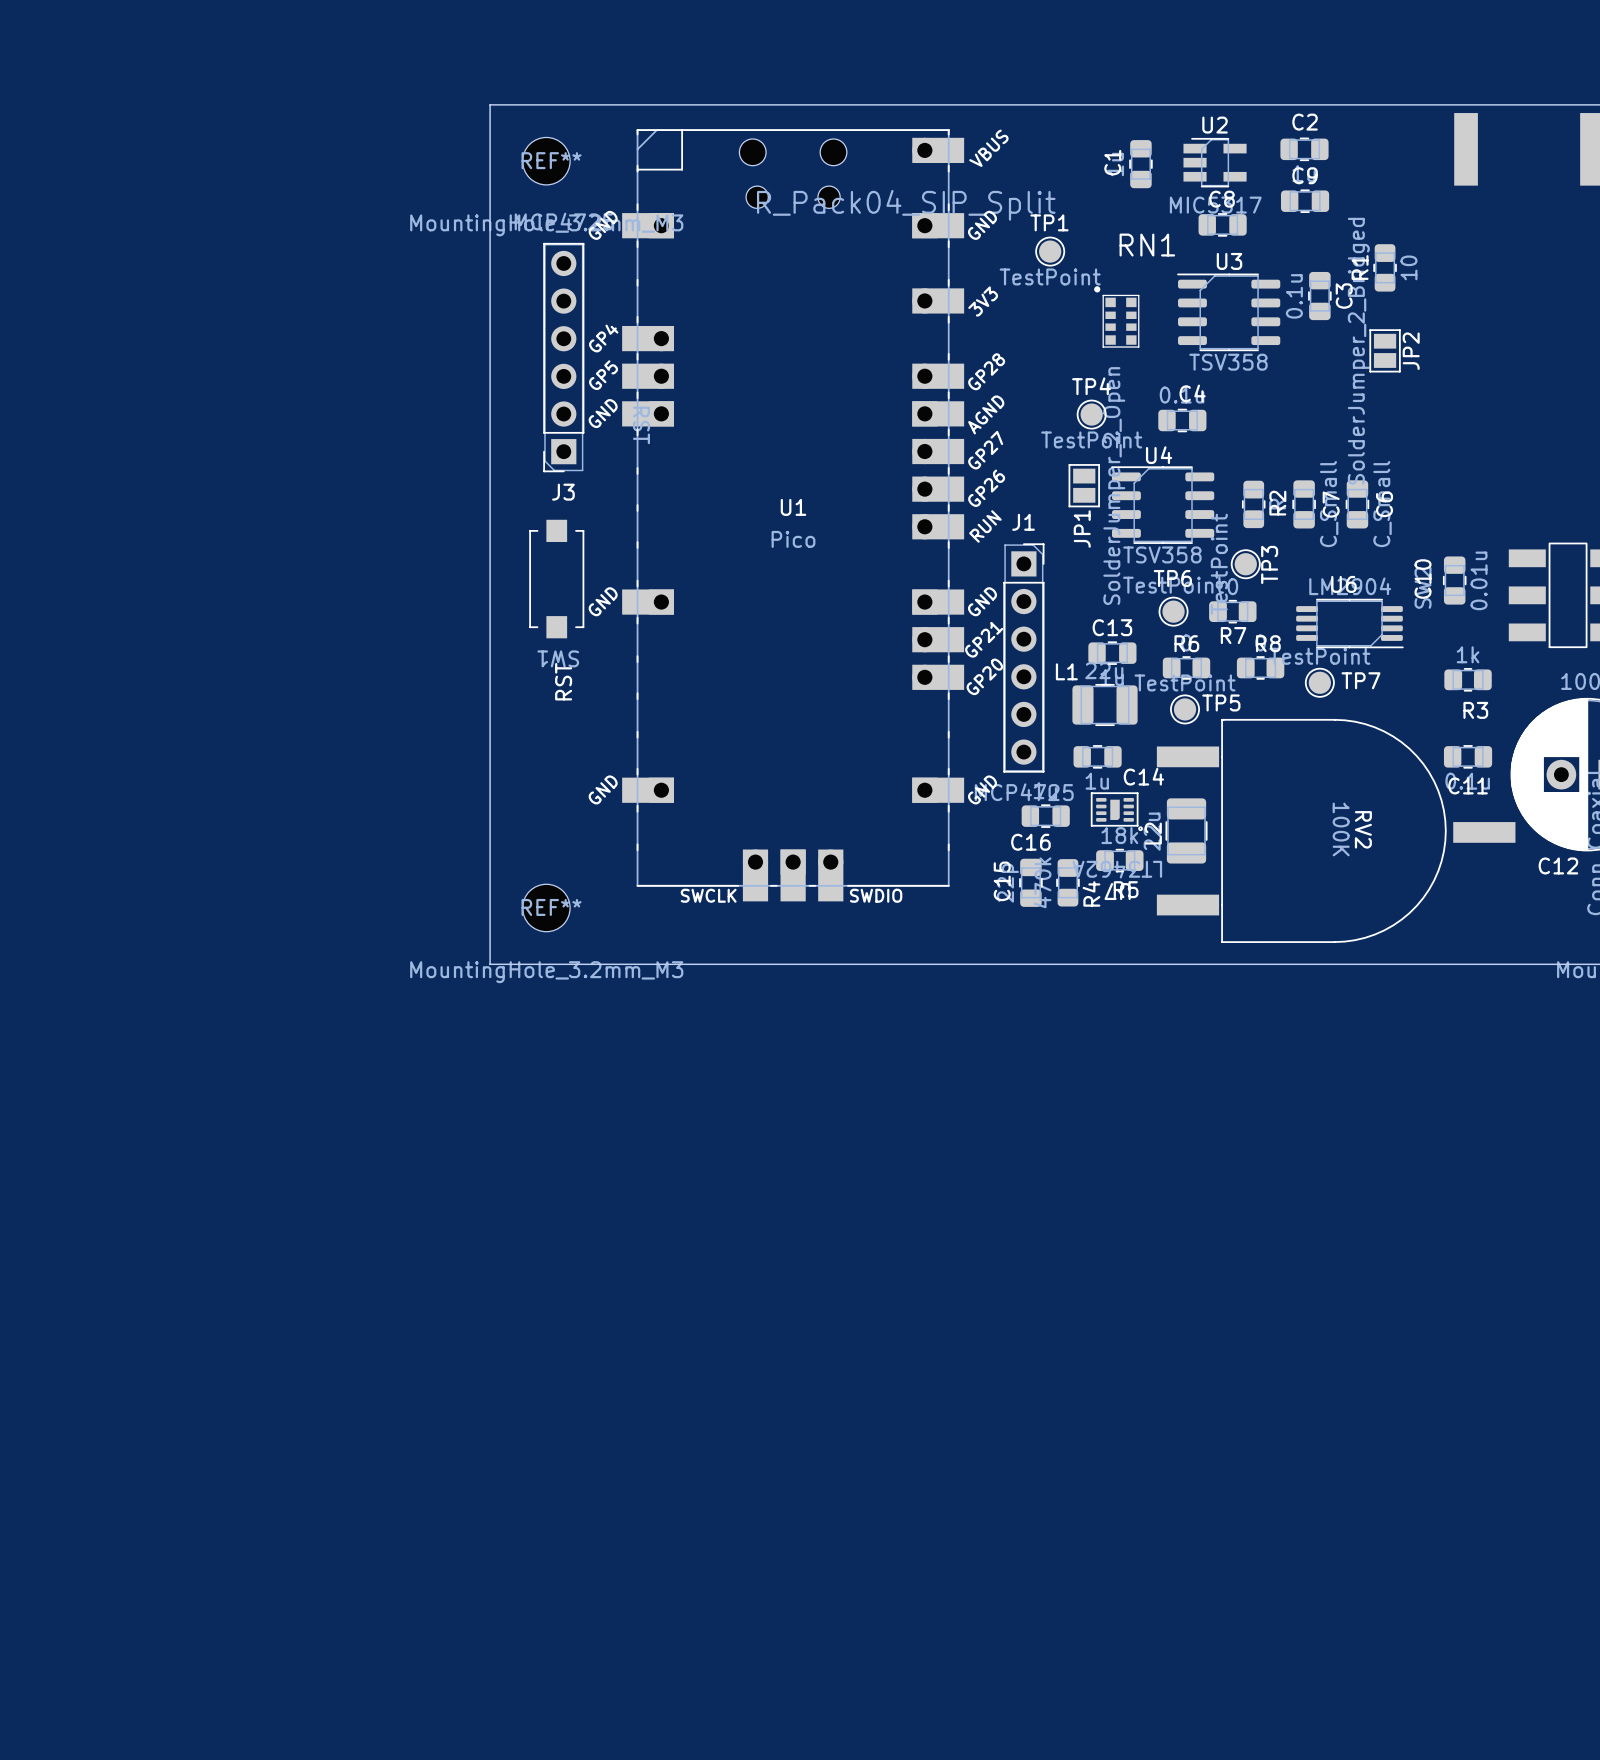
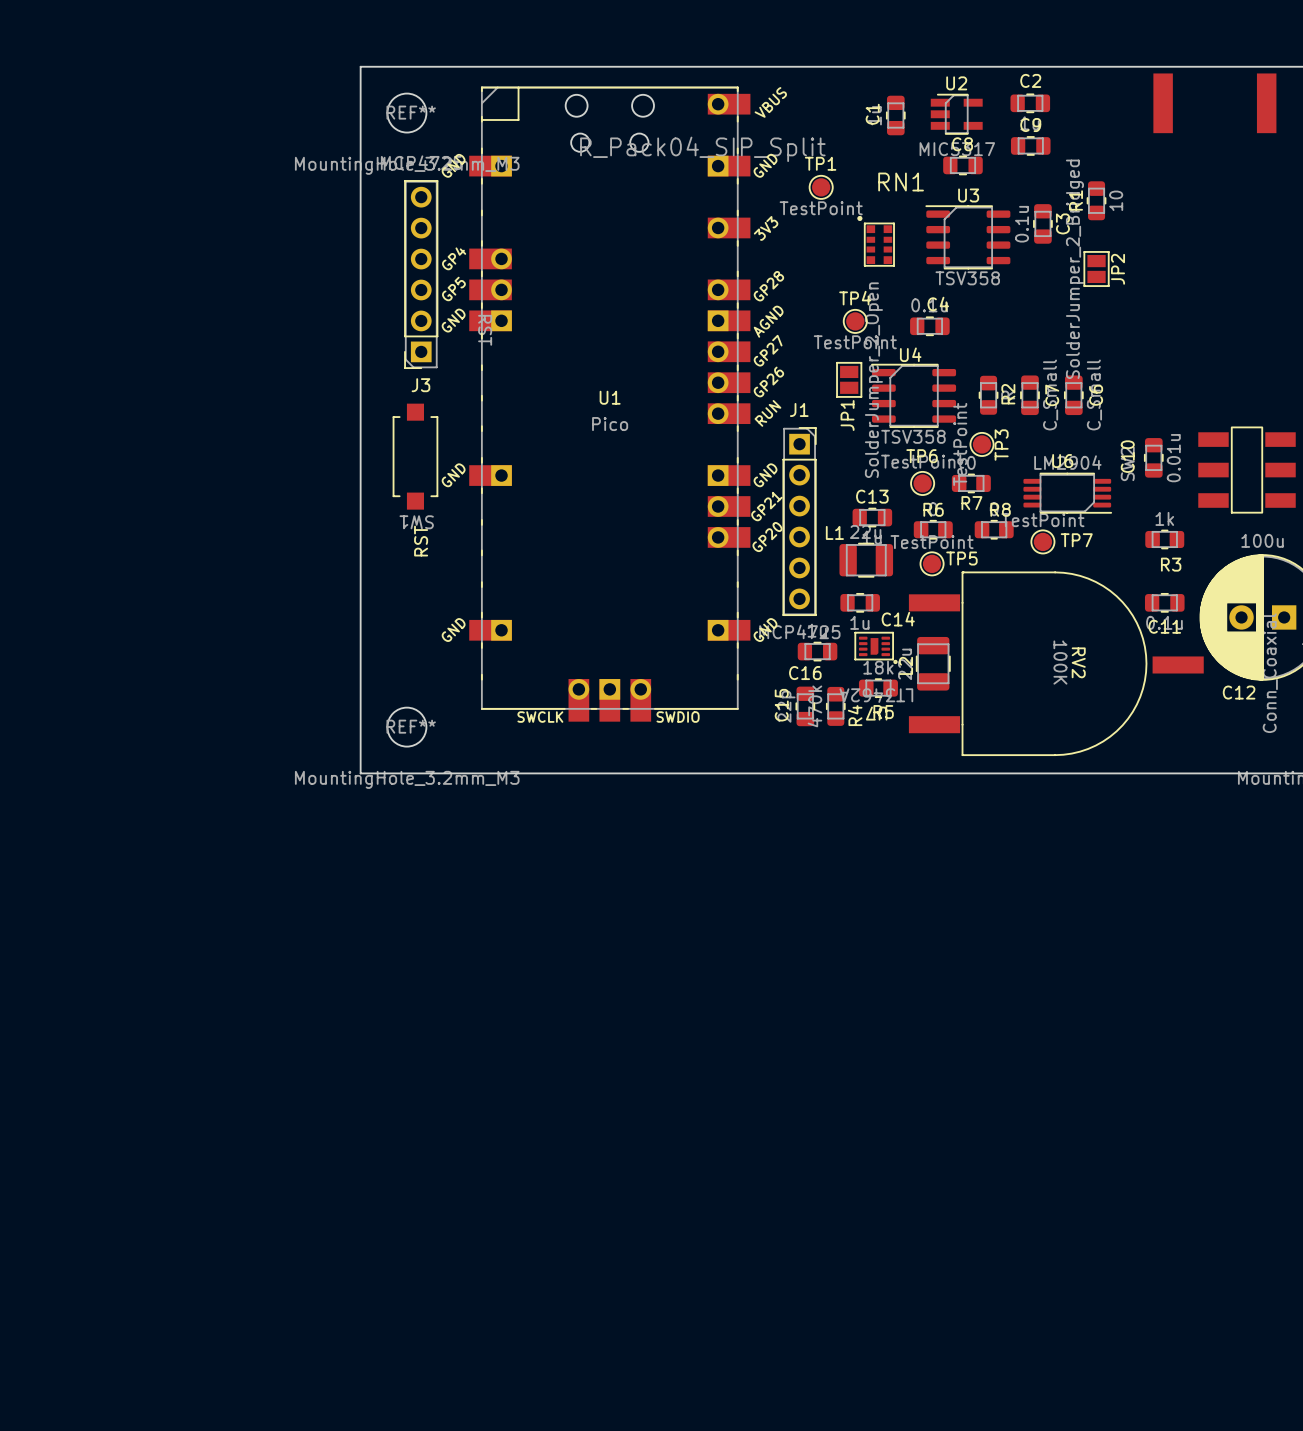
SW1 footprint: [529, 519, 585, 639] -> [392, 403, 439, 510]

